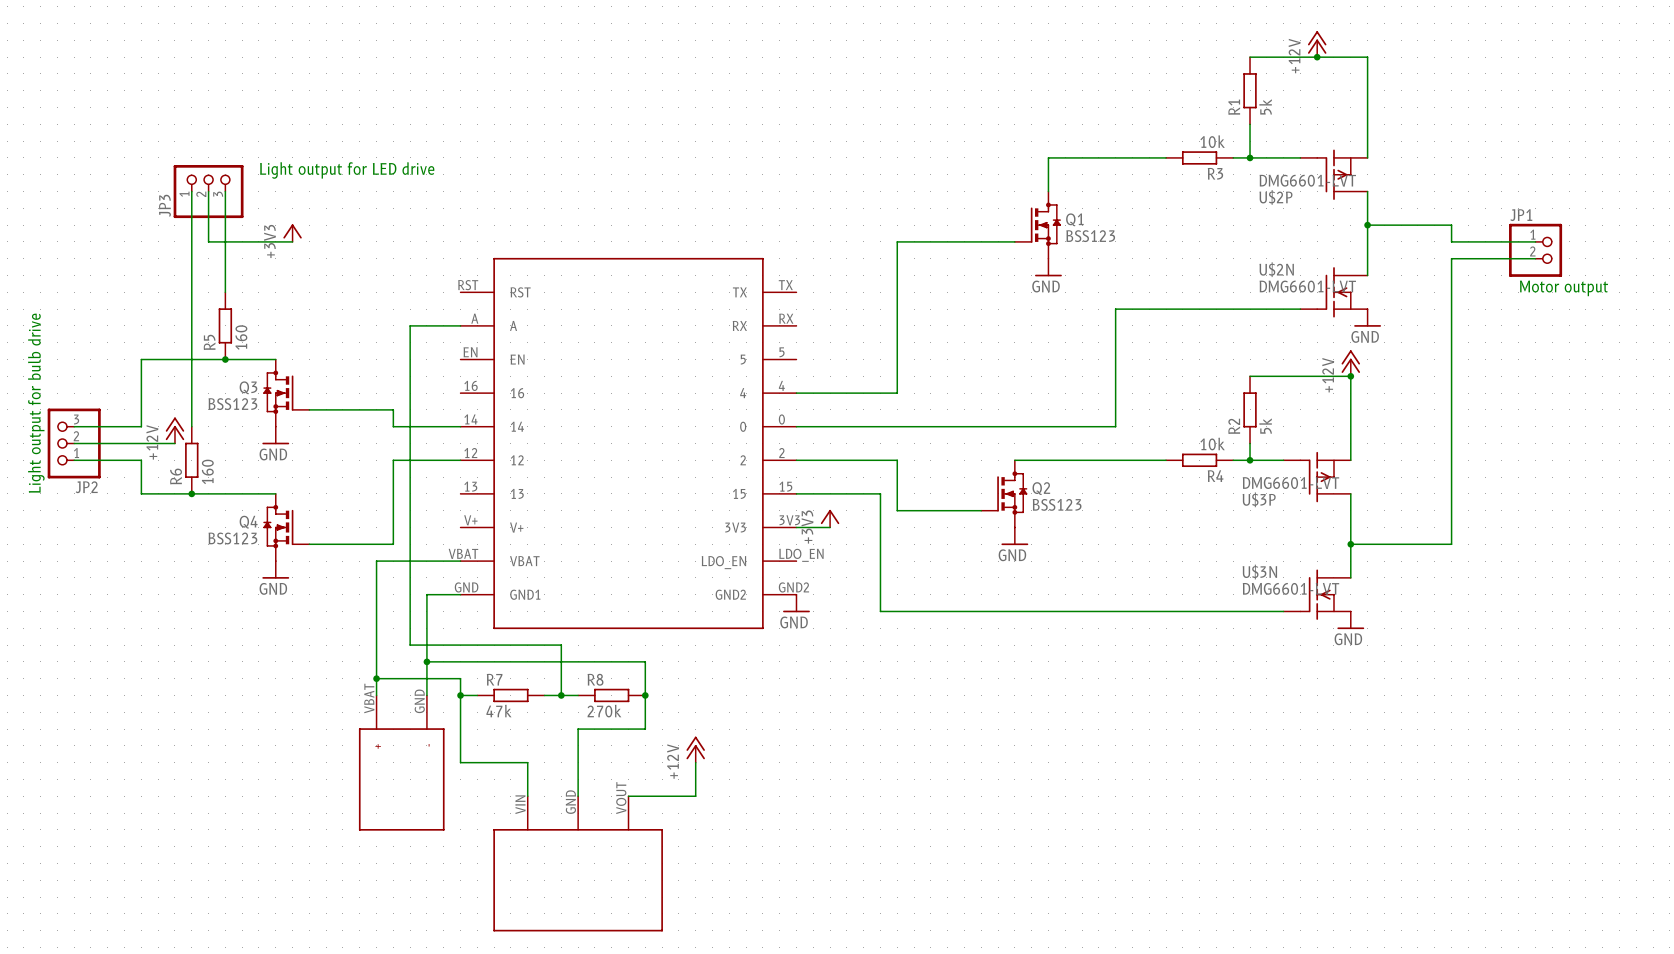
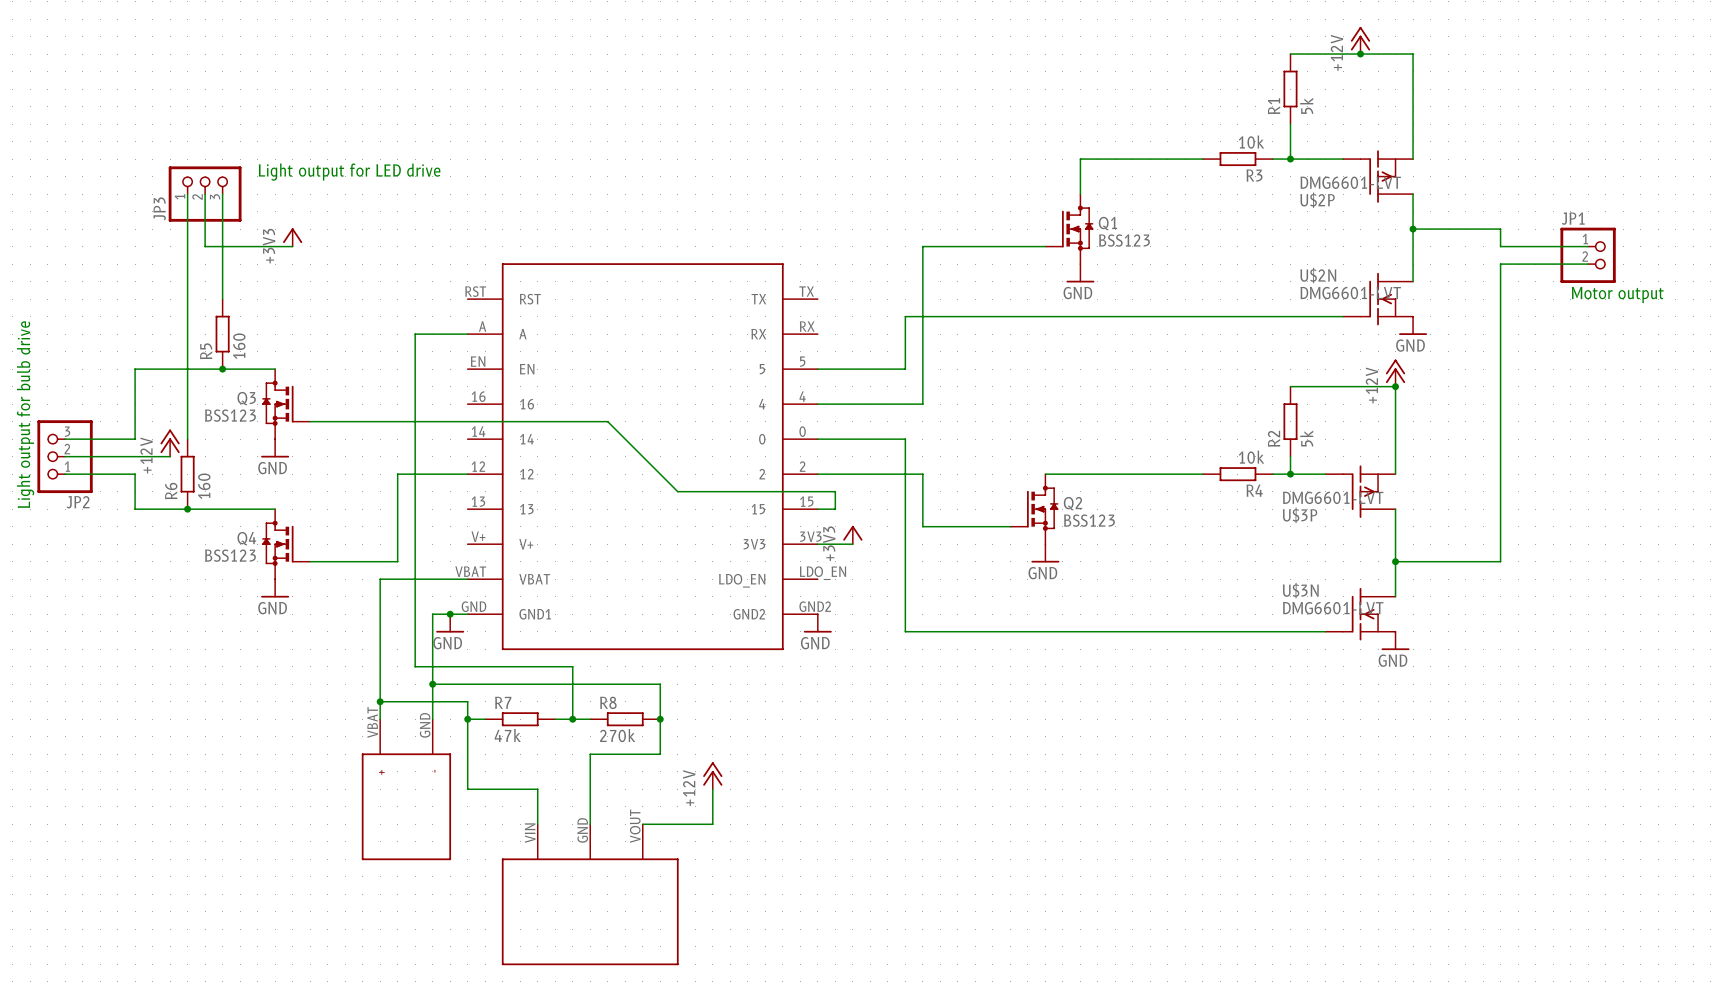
wire: (1115, 309) (1115, 426) (880, 426) -> (1150, 316) (905, 316) (905, 369) (817, 369)
wire: (393, 409) (393, 426) (460, 426) -> (397, 421) (607, 421) (677, 491) (835, 491) (835, 509)
wire: (813, 493) (880, 493) -> (905, 439) (905, 509)
junction: none -> (450, 614)
power symbol: none -> GND (450, 623)

